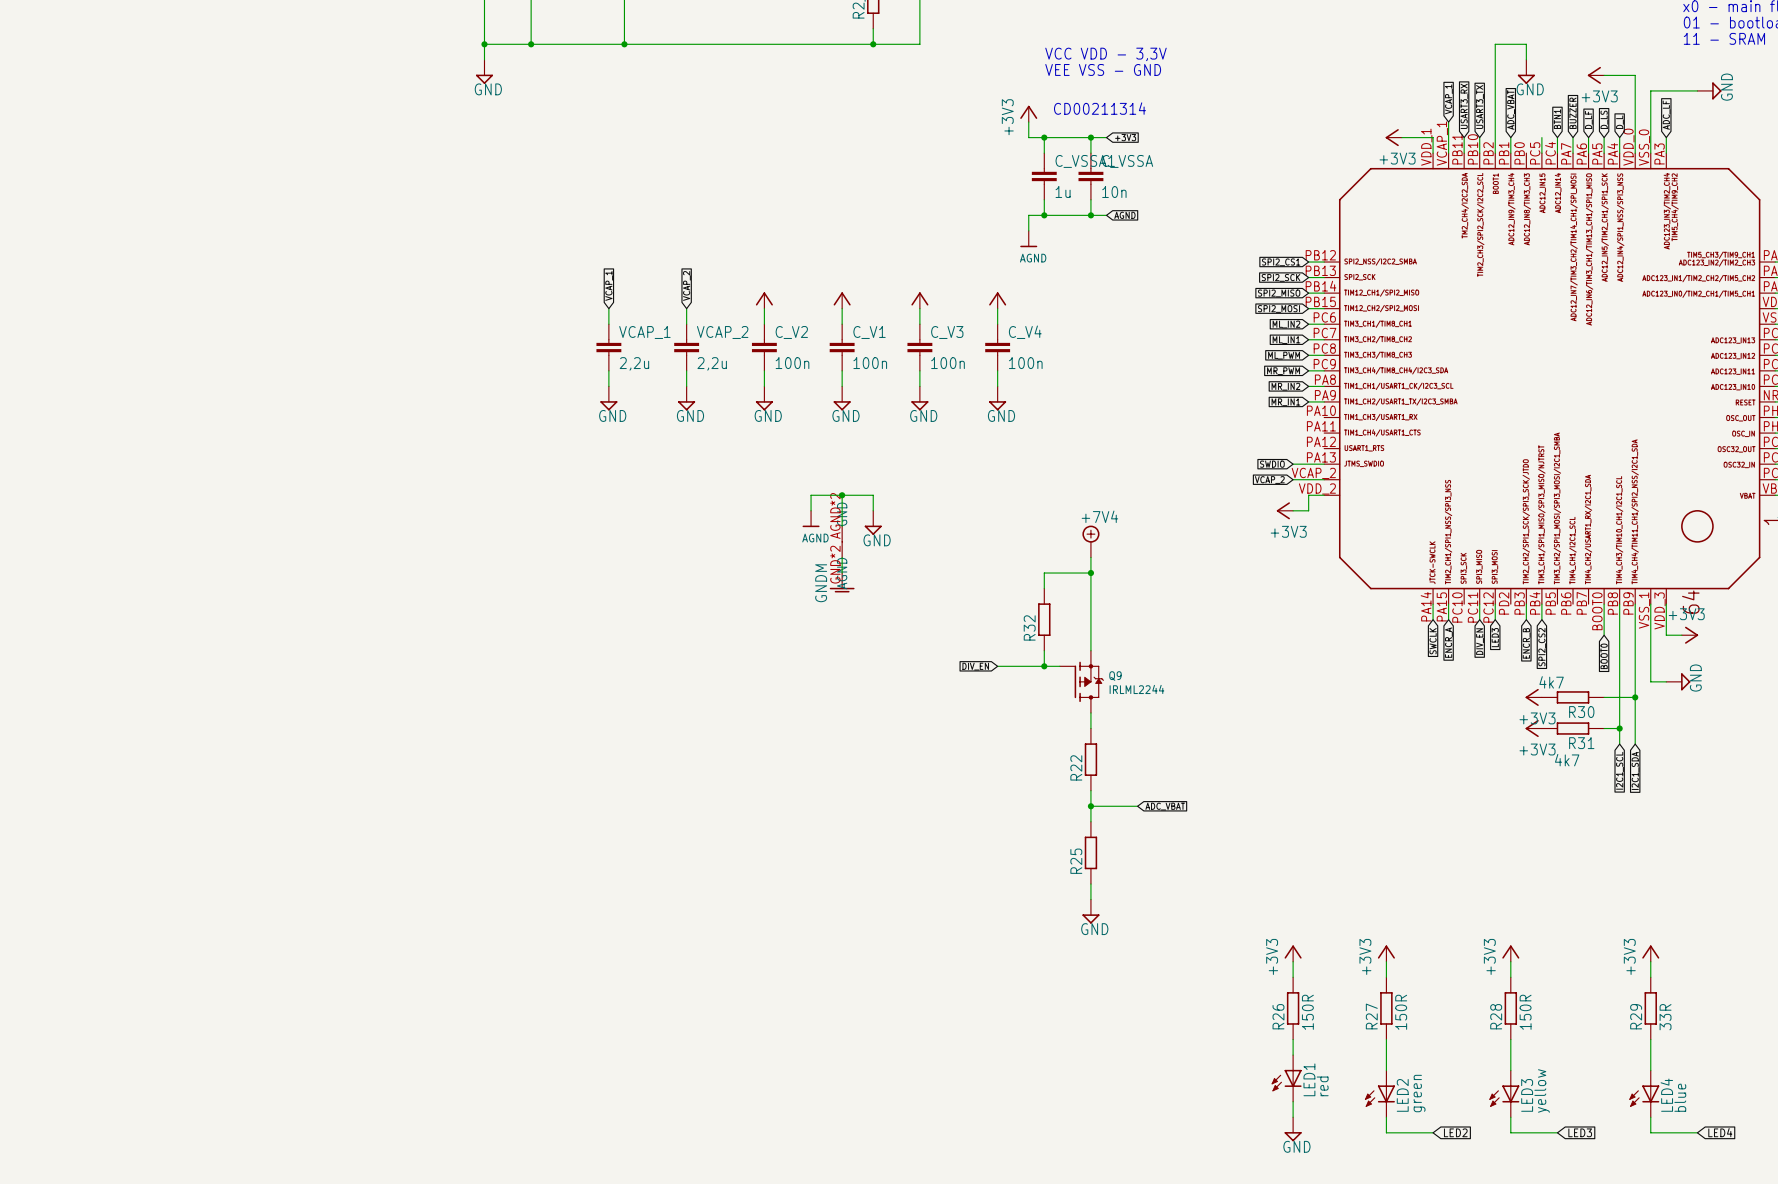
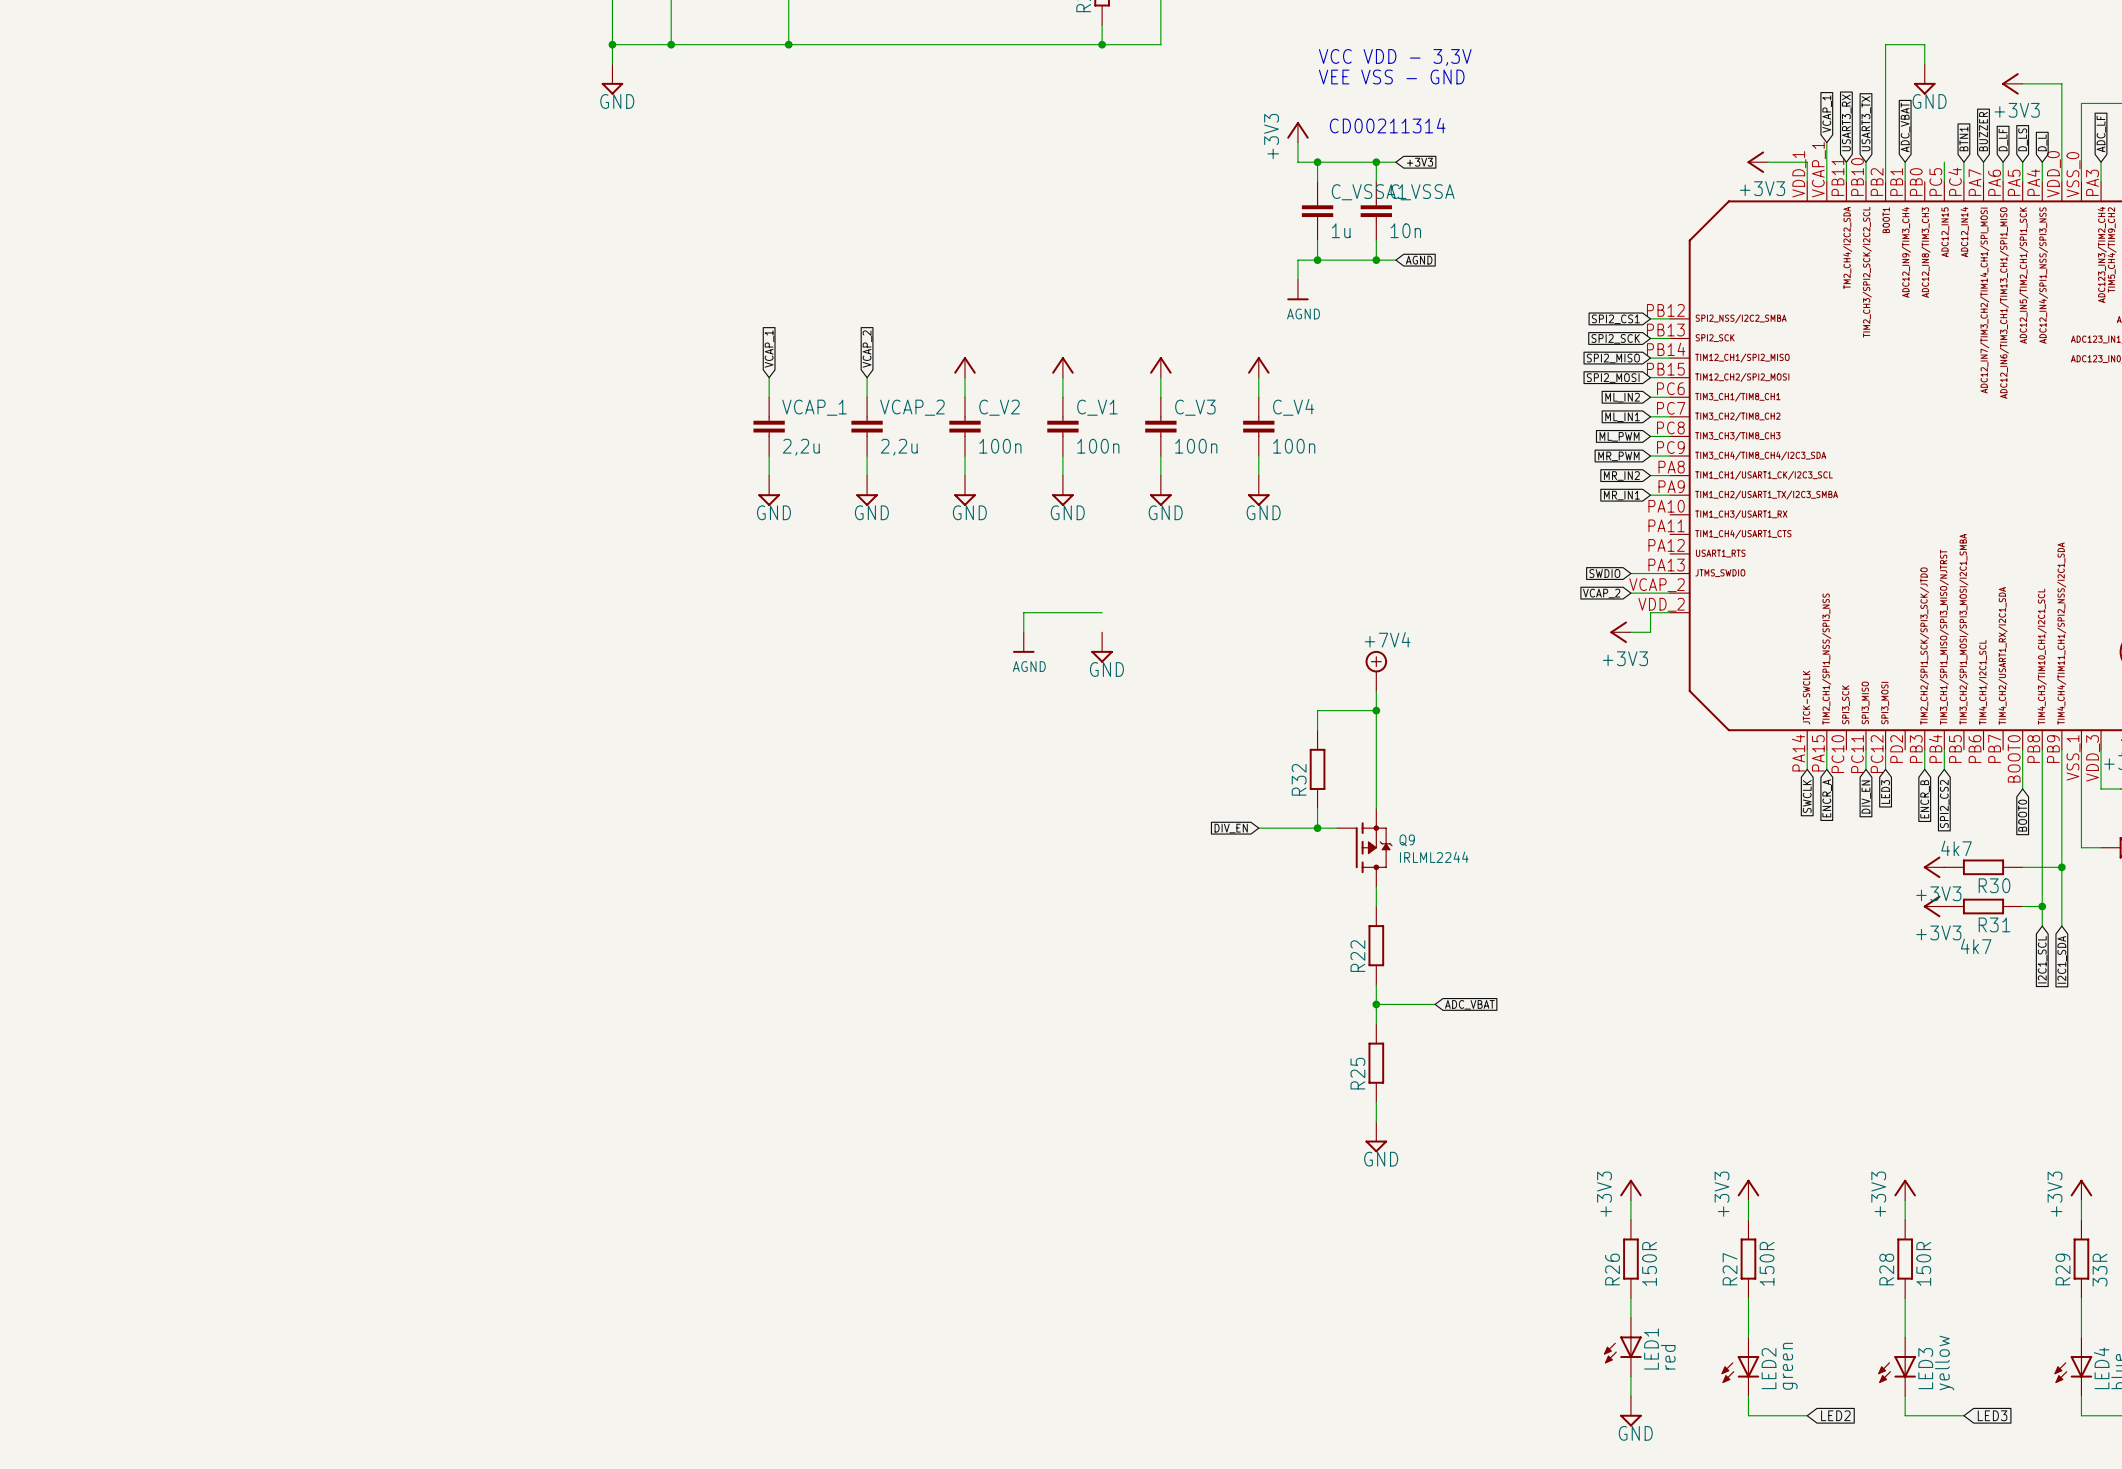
wire: (842, 495) (842, 526) -> none
junction: (842, 495) -> none
wire: (873, 495) (873, 510) -> none
part: (842, 541) -> none
wire: (842, 557) (842, 573) -> none
power symbol: GNDM (842, 582) -> none

